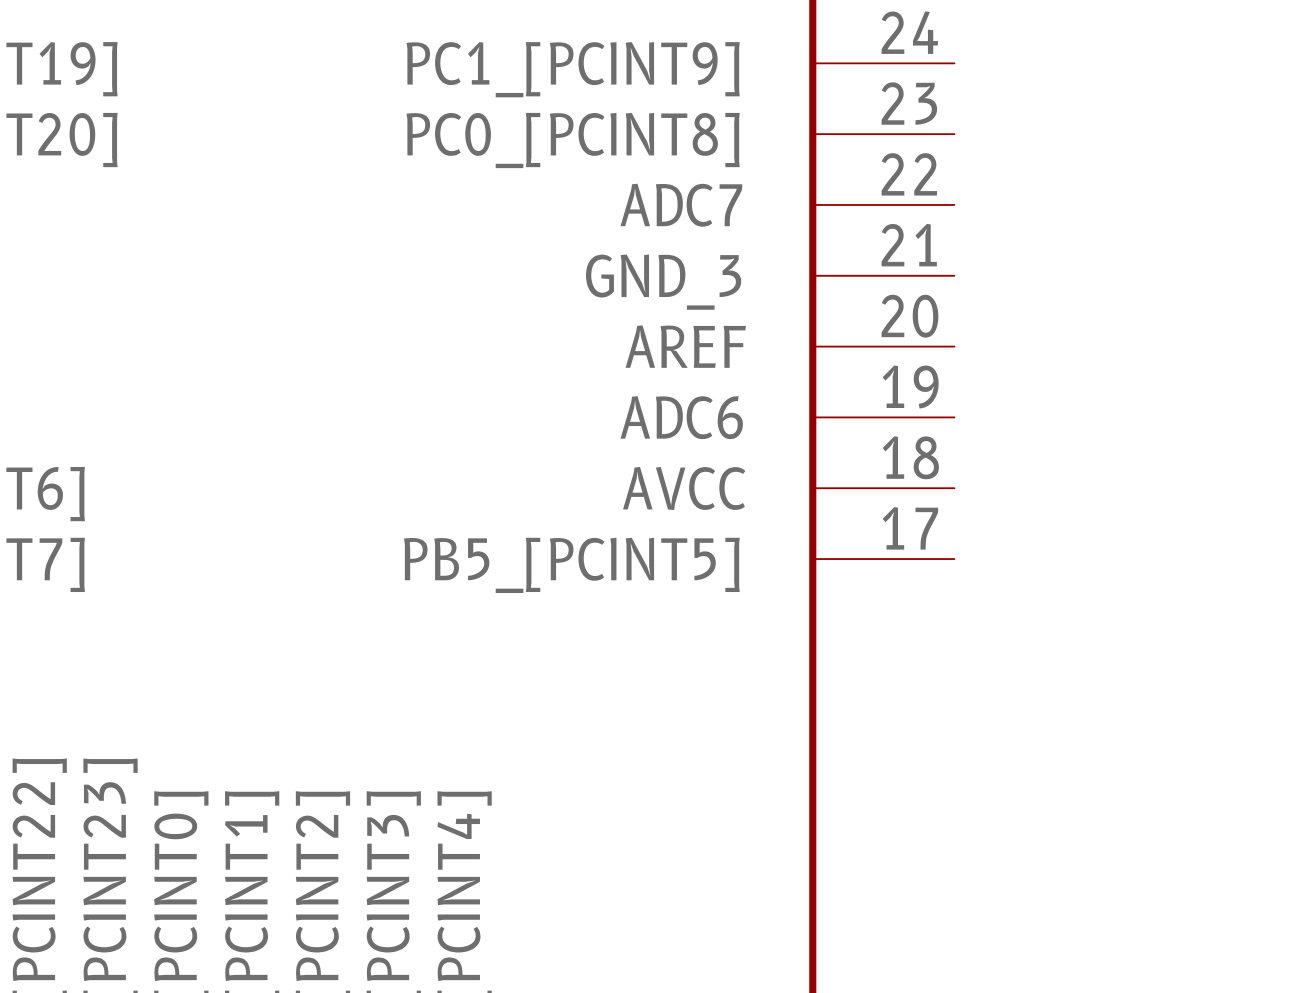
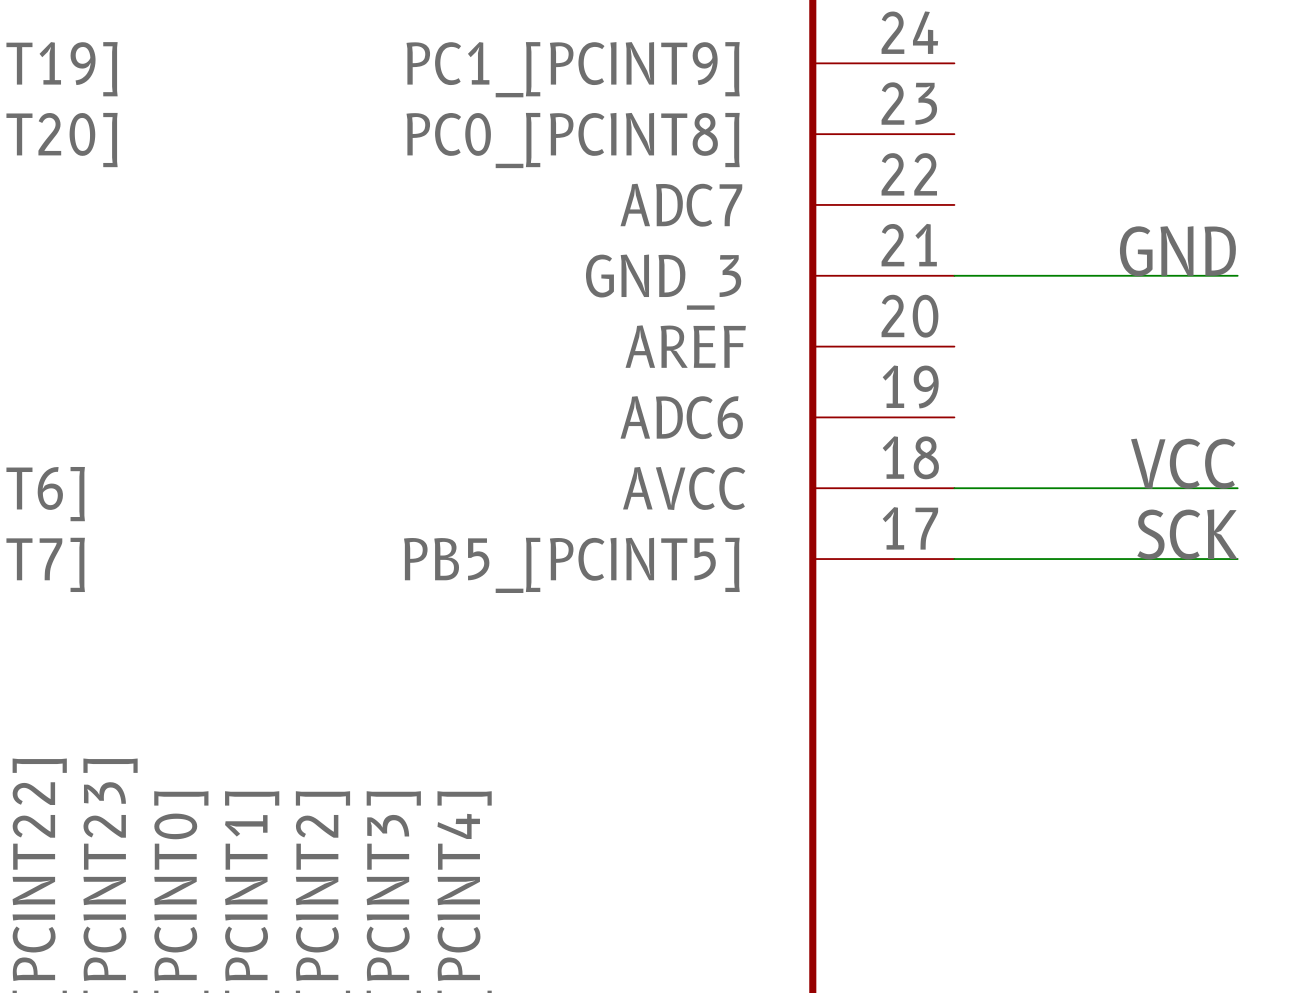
label: none -> GND (1177, 251)
wire: none -> (954, 275) (1237, 275)
label: none -> VCC (1183, 463)
wire: none -> (954, 488) (1237, 488)
label: none -> SCK (1187, 534)
wire: none -> (954, 559) (1237, 559)

